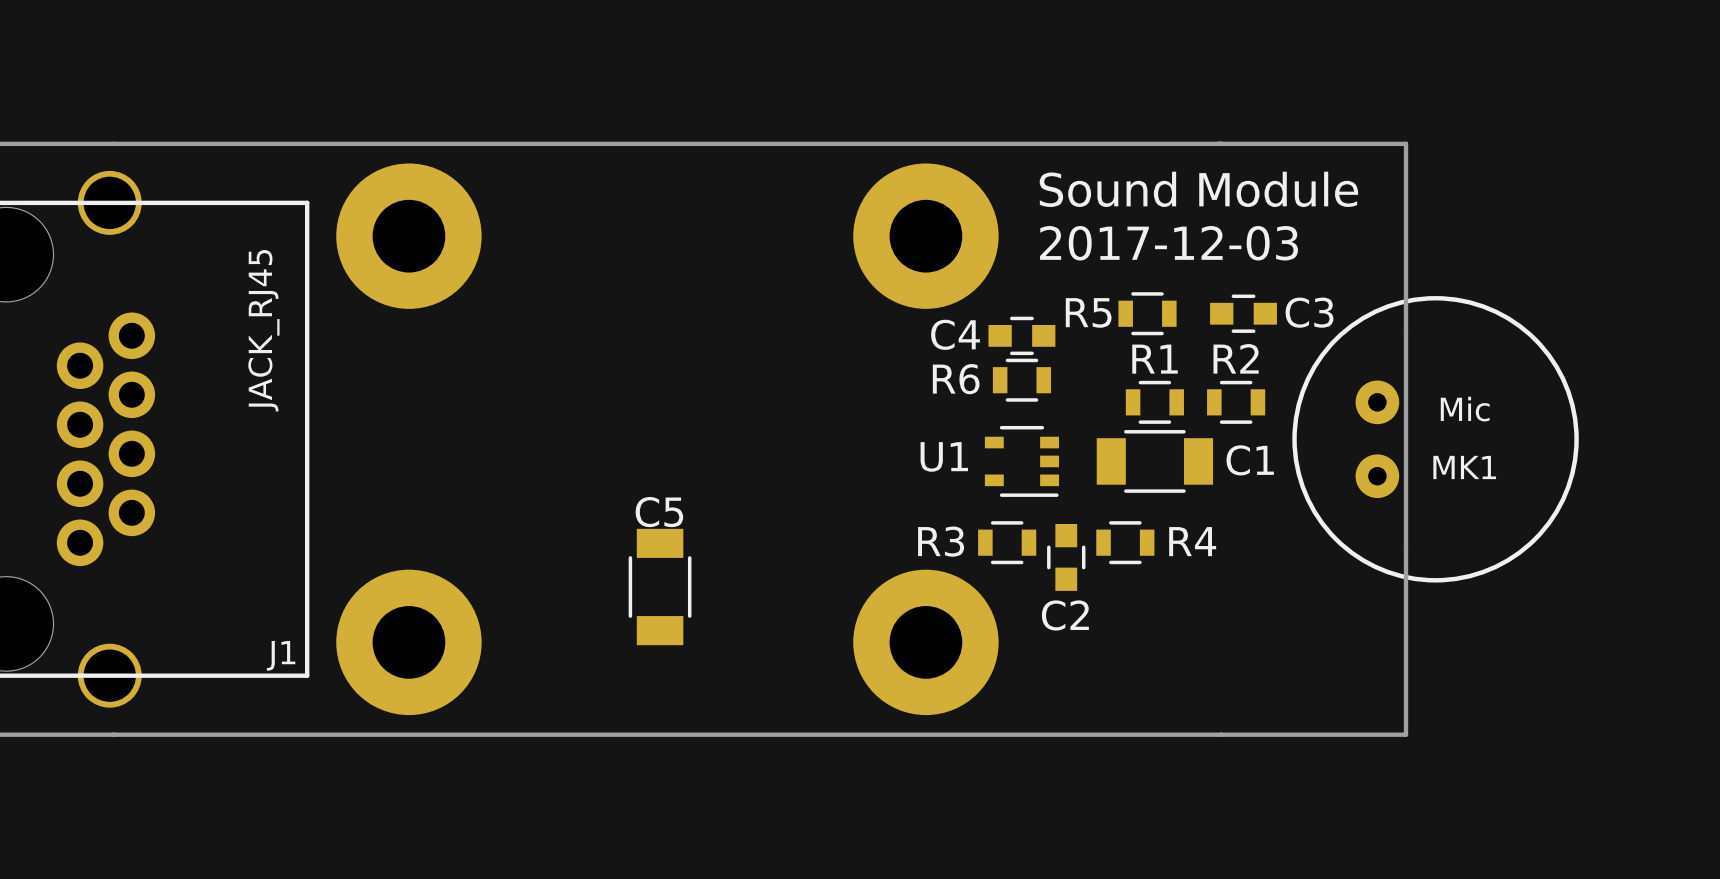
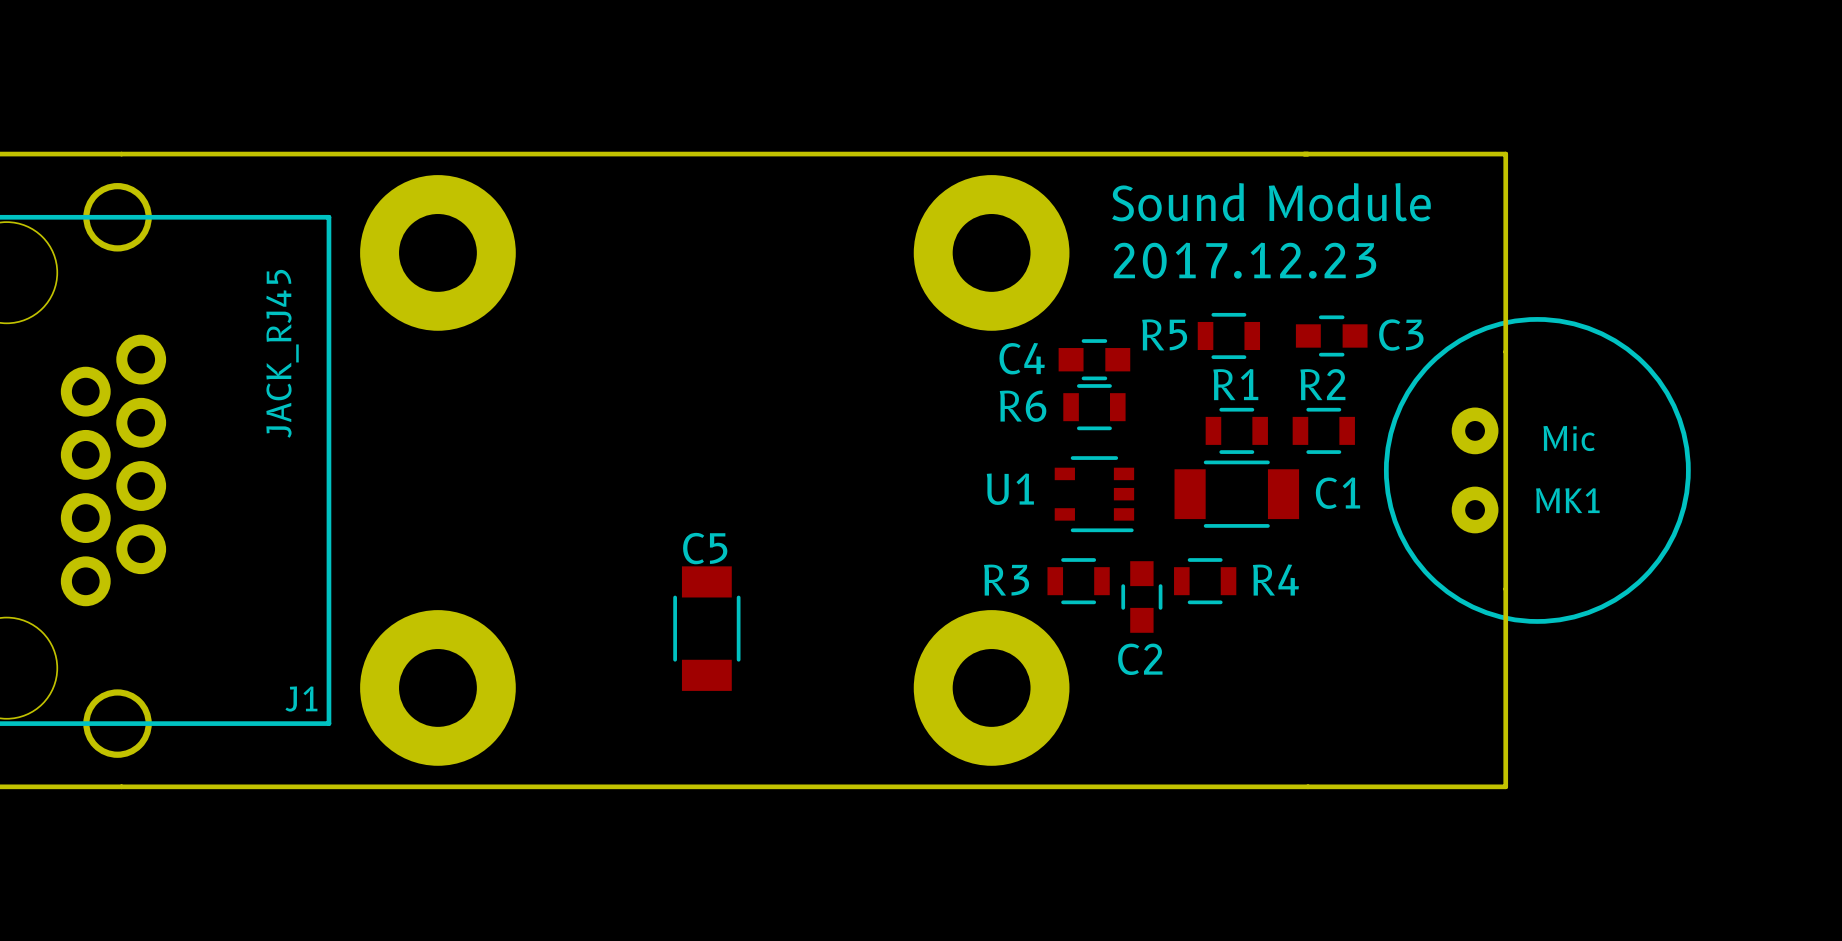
text: 2017-12-03 (1169, 243) -> 2017.12.23 (1245, 260)

